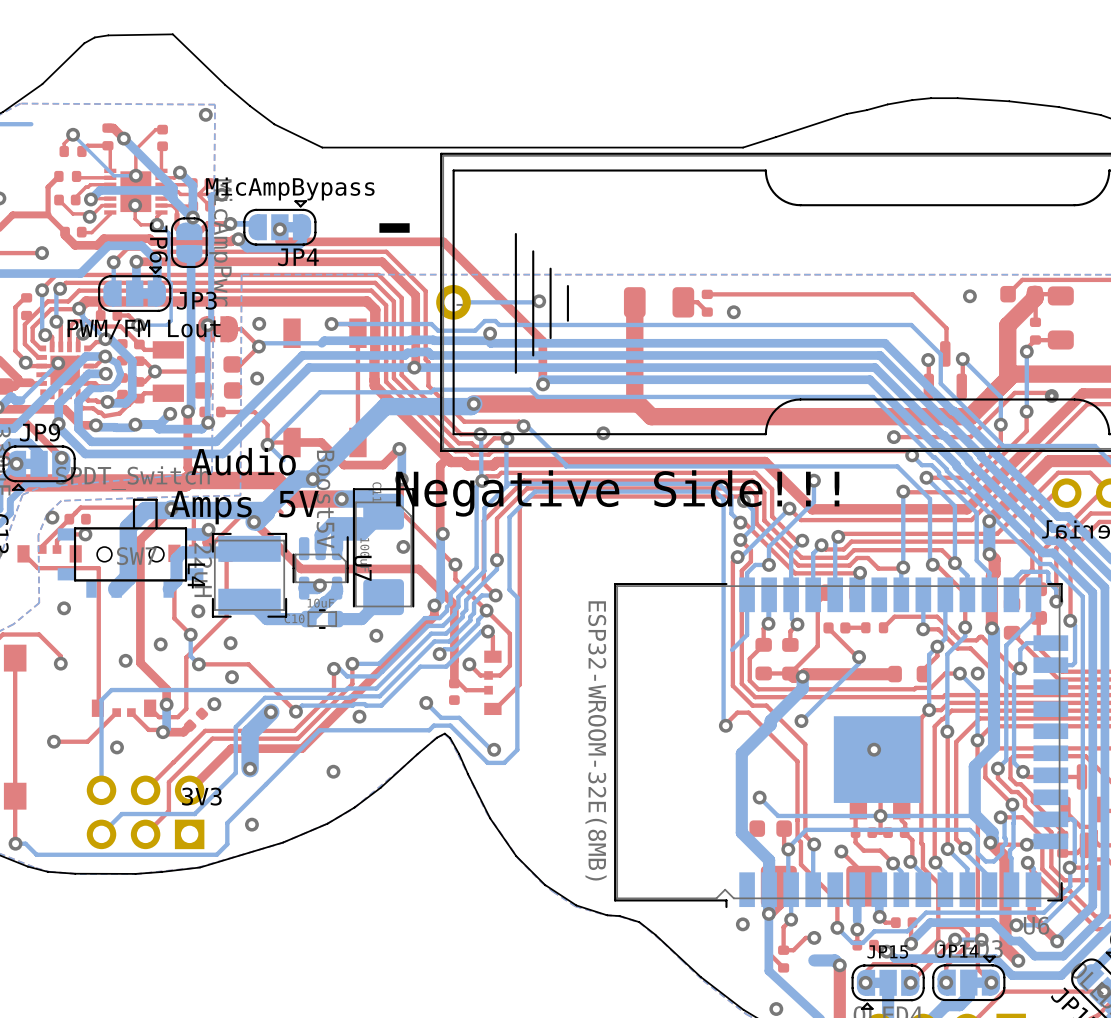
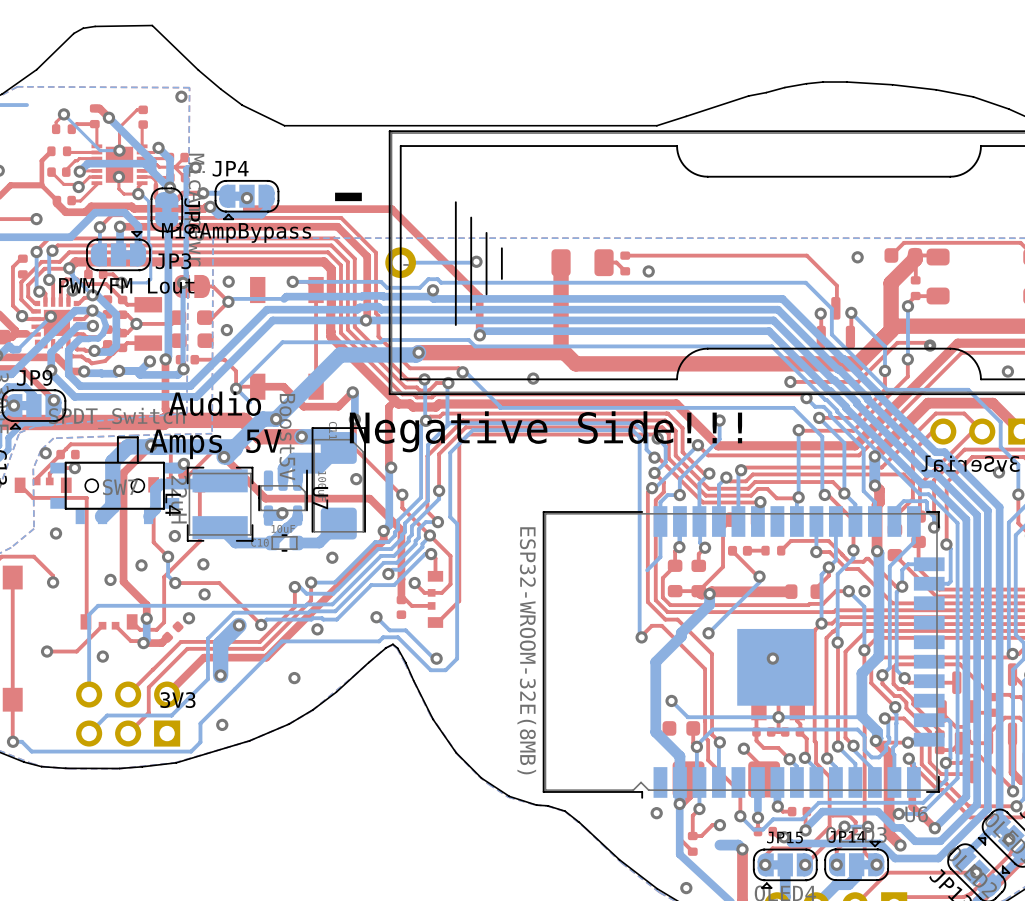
JP6 footprint: [170, 217, 208, 269] -> [150, 187, 184, 233]
JP4 rotation: 0° (279, 222) -> 180° (246, 200)
JP6 name position: JP6 (158, 242) -> JP6 (192, 216)

